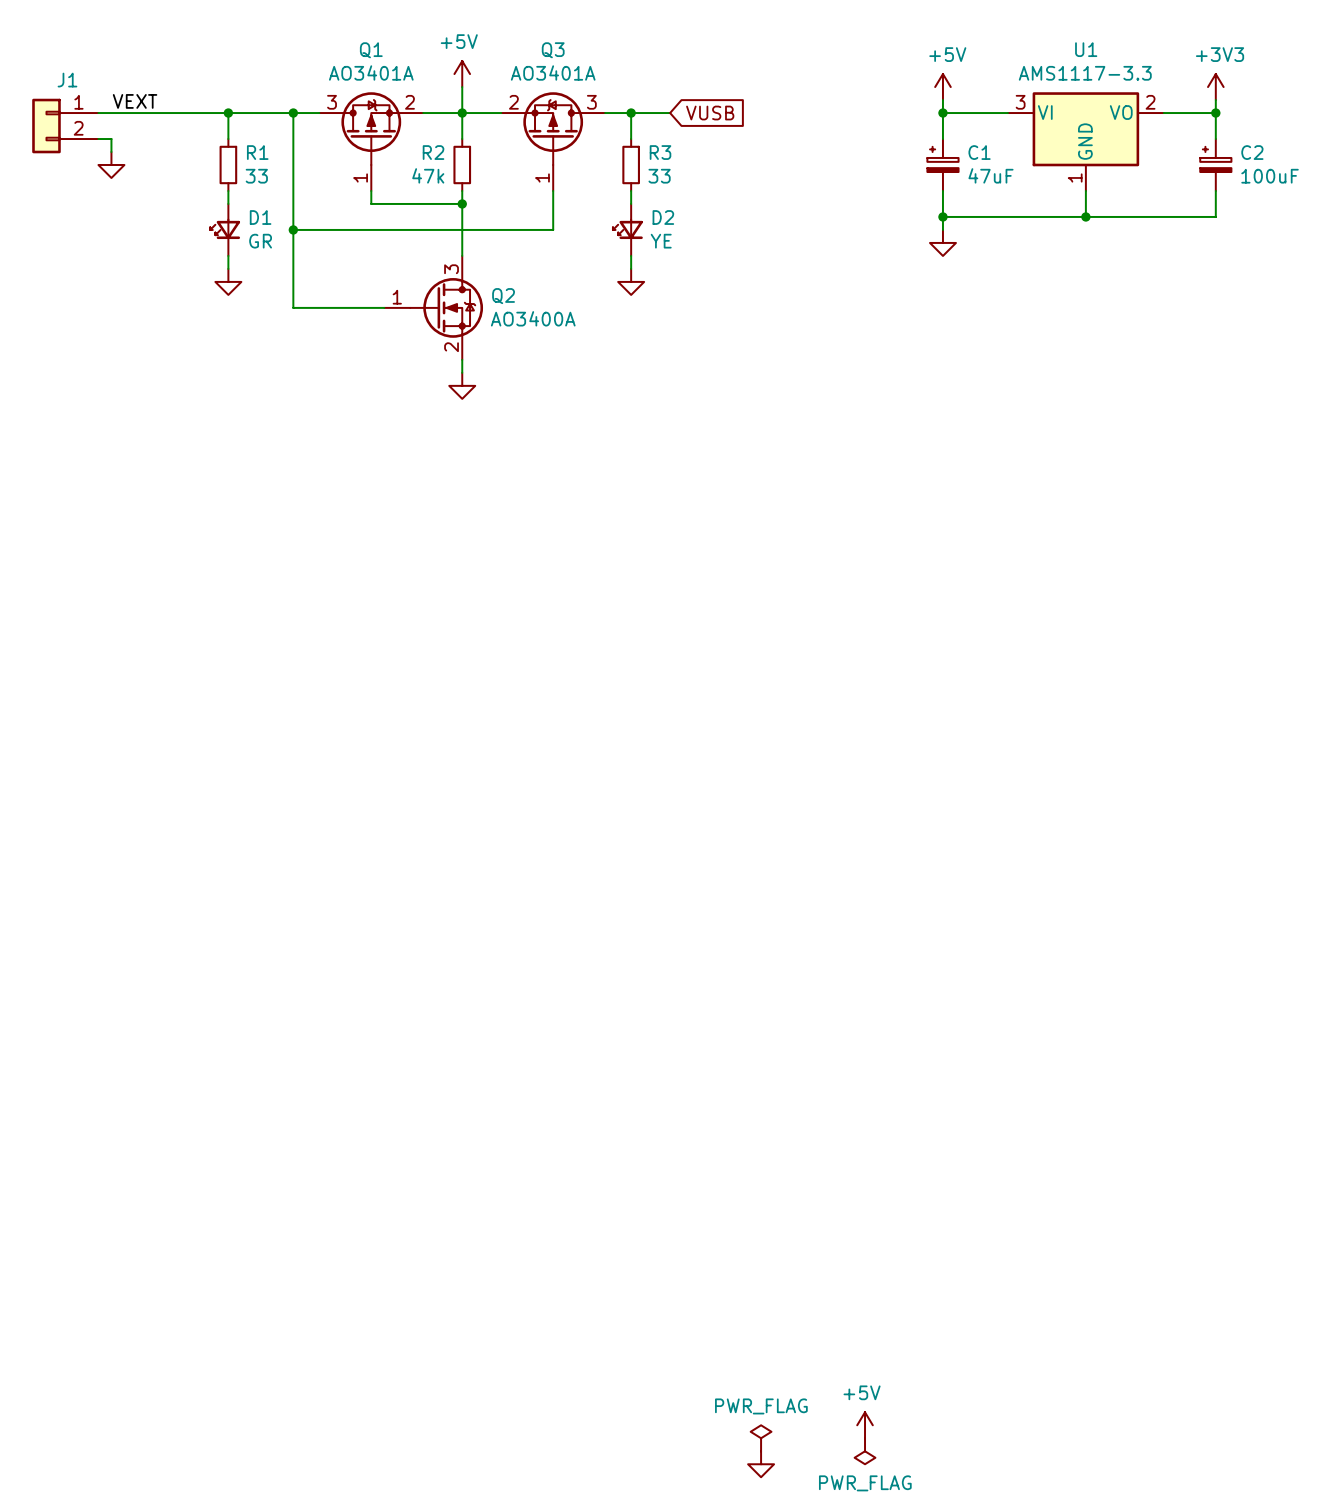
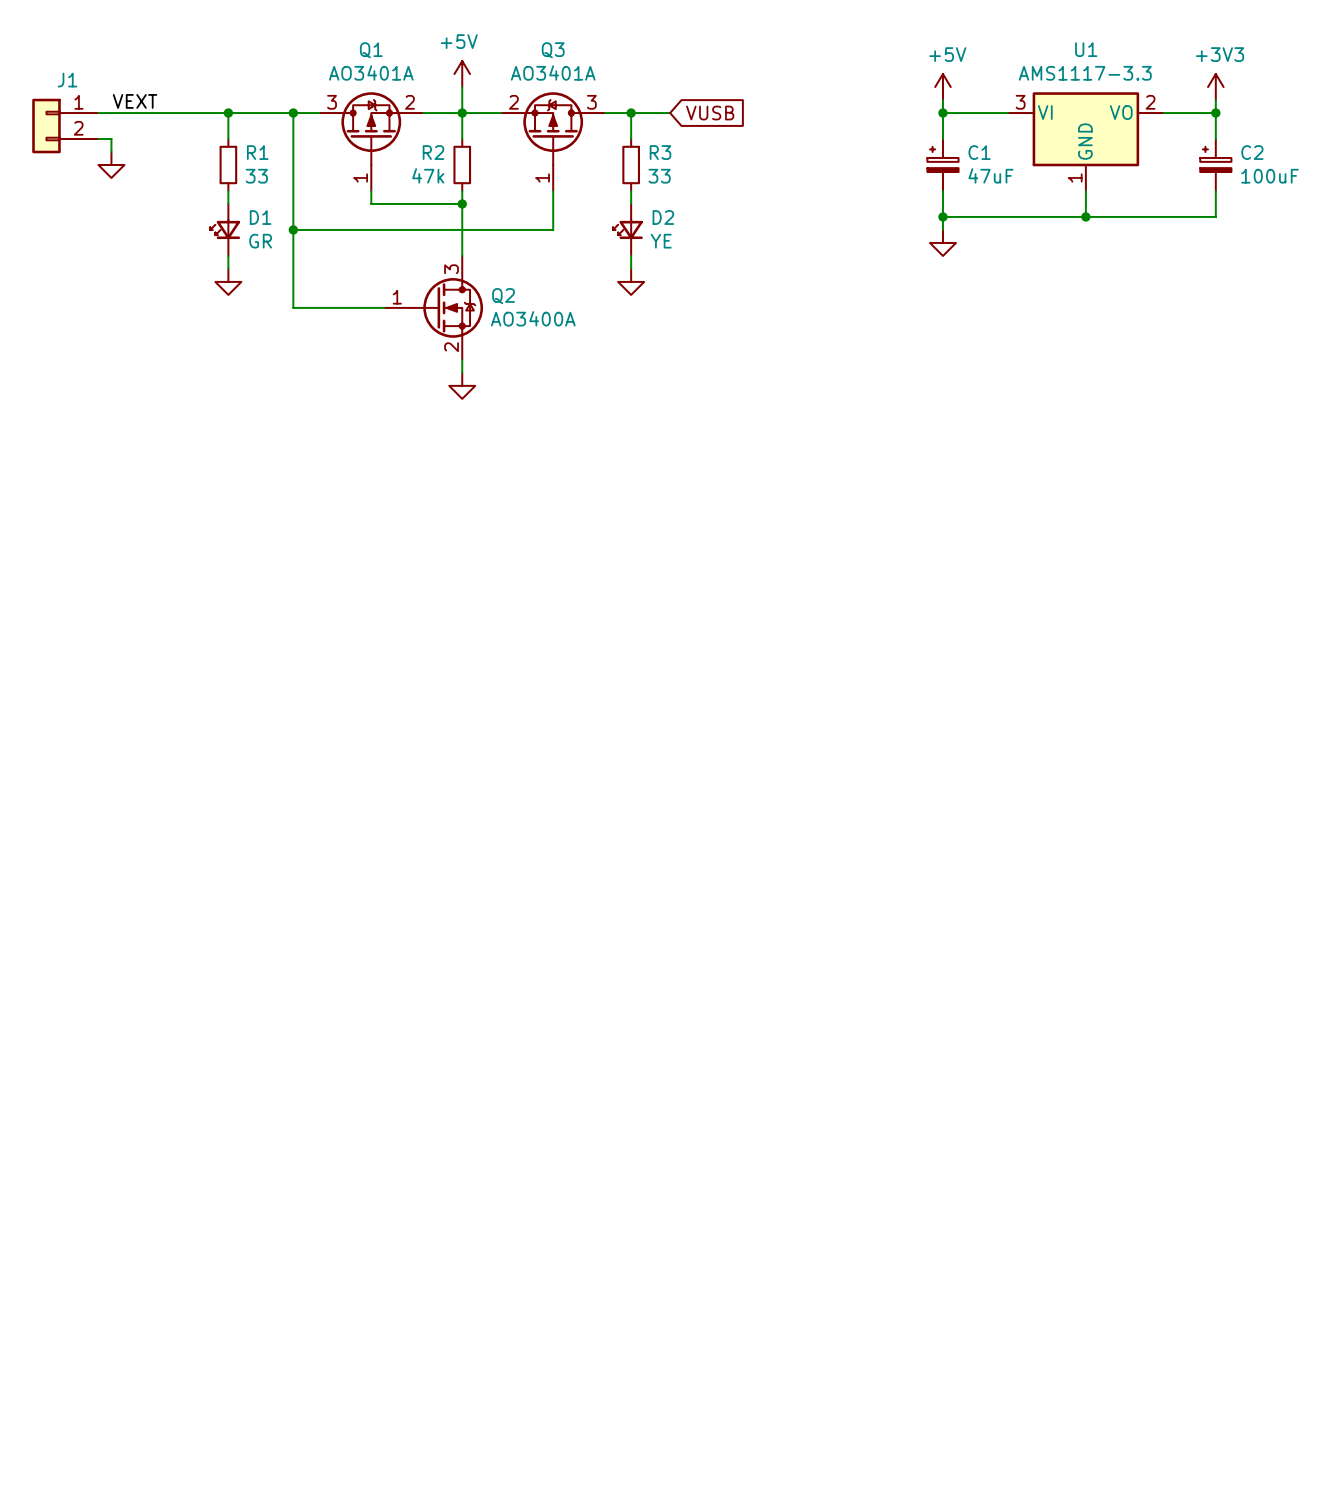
power symbol: +5V (865, 1425) -> none
power symbol: PWR_FLAG (761, 1438) -> none
power symbol: PWR_FLAG (865, 1451) -> none
power symbol: (761, 1464) -> none

